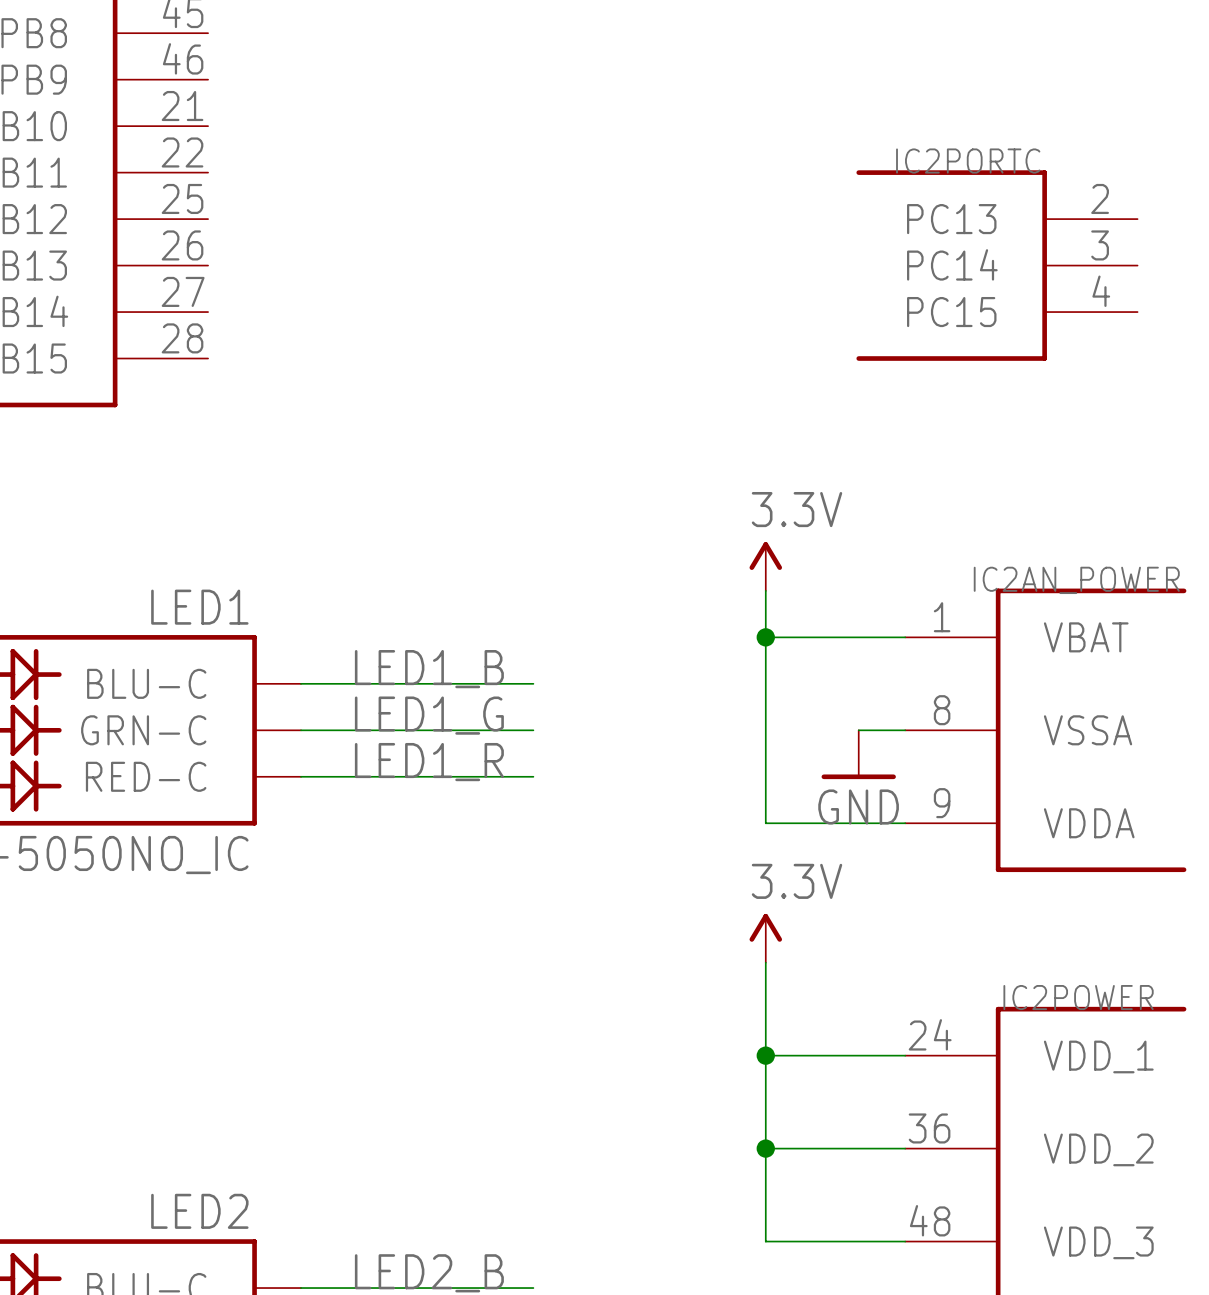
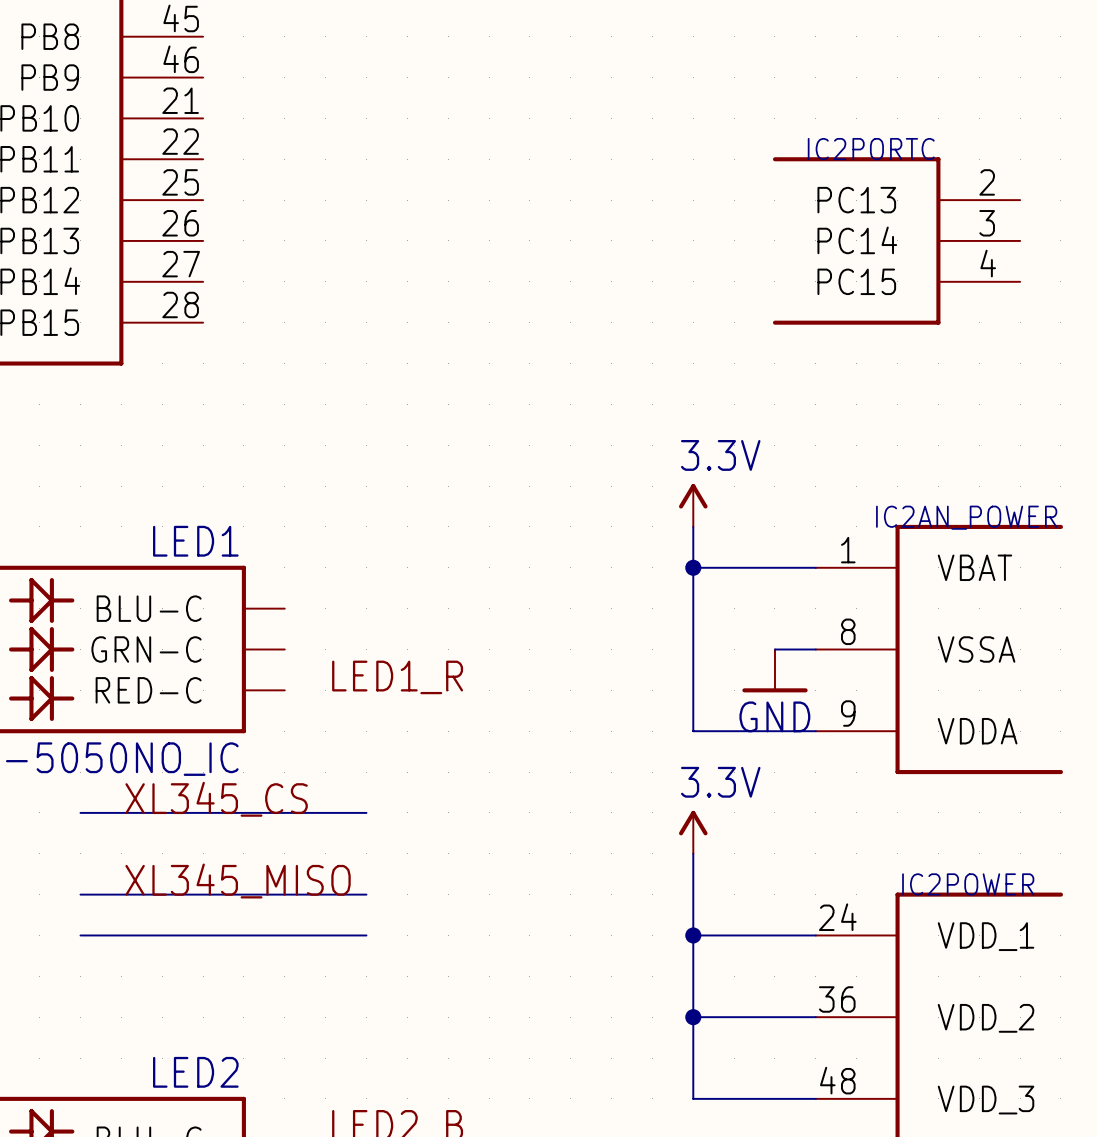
label: LED1_B (429, 669) -> none
wire: (301, 683) (533, 683) -> none
label: LED1_G (429, 715) -> none
wire: (301, 730) (533, 730) -> none
wire: (301, 776) (533, 776) -> none
label: none -> XL345_CS (216, 799)
wire: none -> (80, 812) (366, 812)
label: none -> XL345_MISO (238, 881)
wire: none -> (80, 894) (366, 894)
wire: none -> (80, 935) (366, 935)

